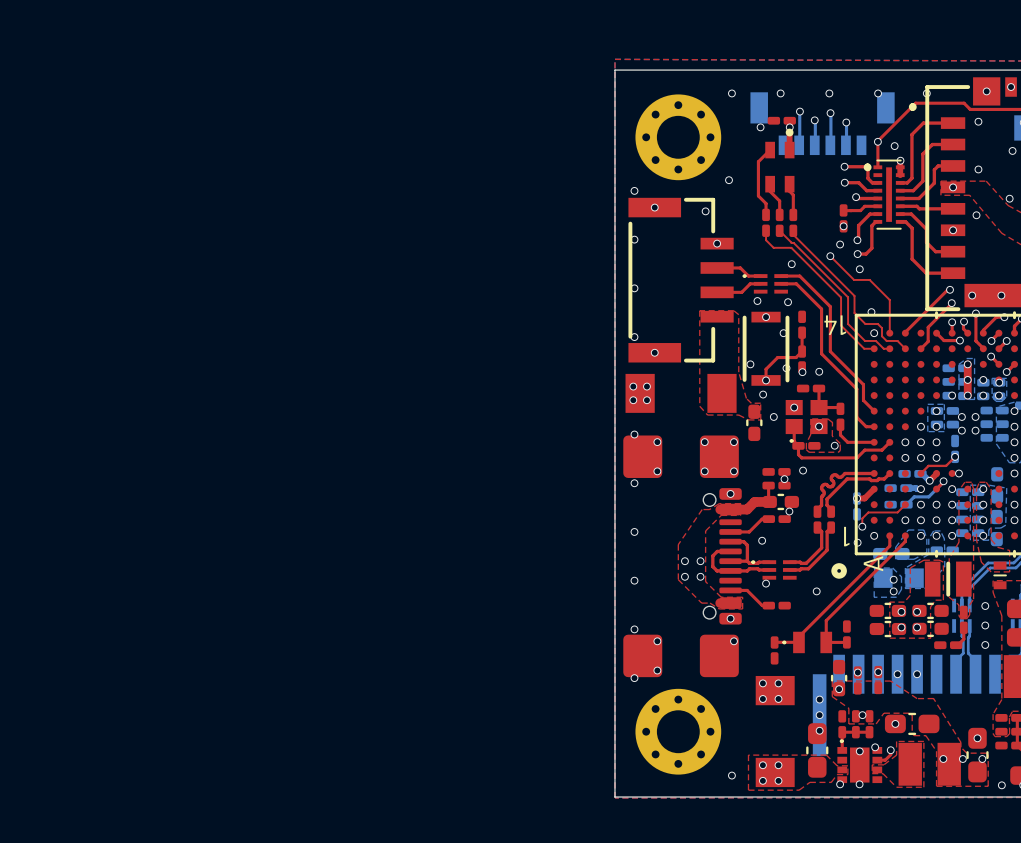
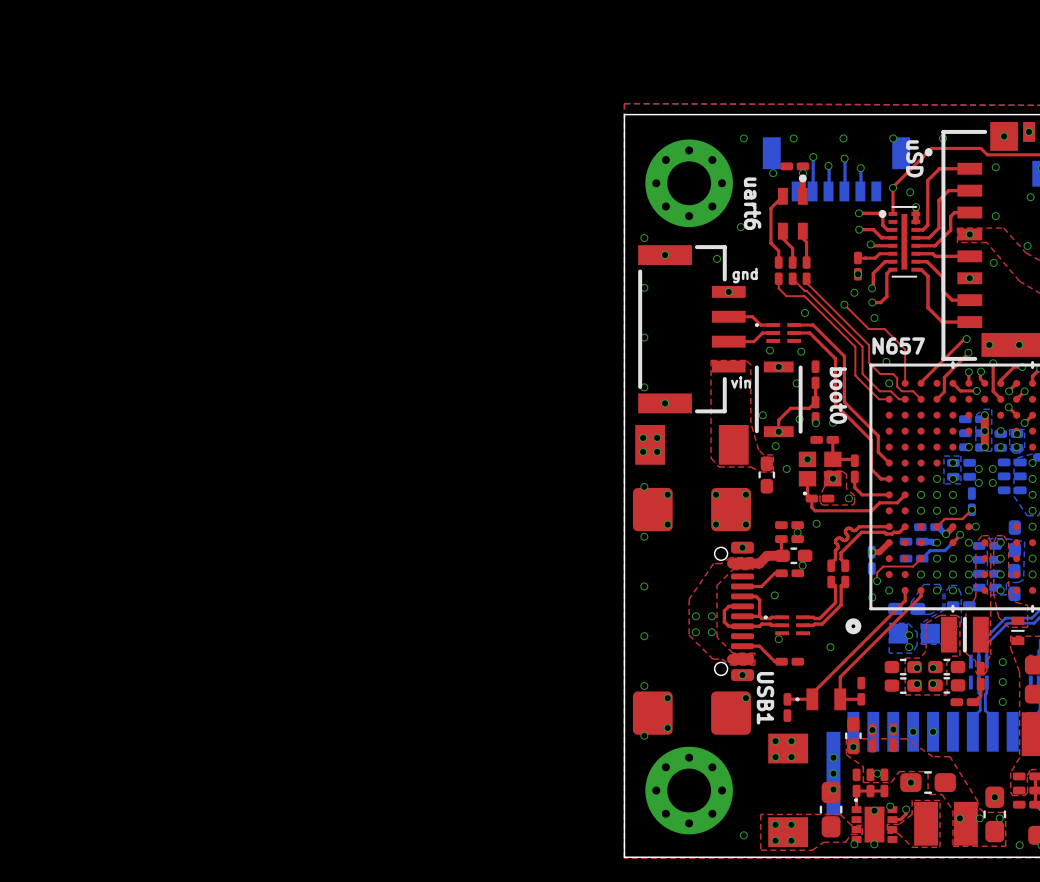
text: none -> uSD (914, 158)
text: none -> uart6 (752, 203)
text: none -> gnd (745, 275)
text: none -> N657 (898, 346)
part text: 14 (835, 325) -> none
text: none -> vin (740, 382)
text: none -> boot0 (838, 395)
part text: 1 (846, 536) -> none
part text: A (873, 563) -> none
text: none -> USB1 (765, 698)

